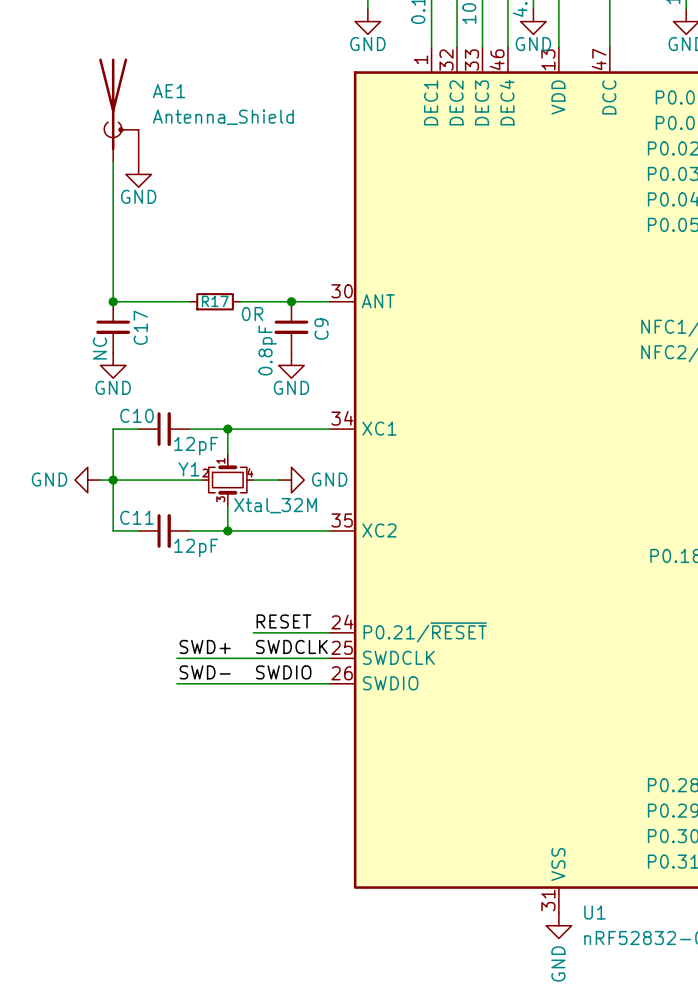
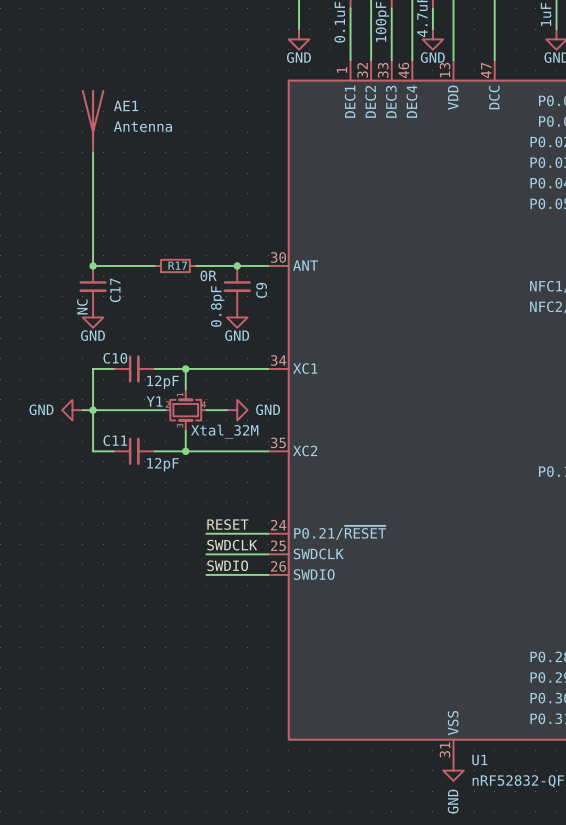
AE1 symbol: [99, 58, 139, 162] -> [81, 89, 105, 153]
AE1 value: Antenna_Shield (223, 117) -> Antenna (142, 126)
power symbol: GND (138, 174) -> none
label: SWD+ (205, 646) -> none
wire: (176, 658) (253, 658) -> none
label: SWD- (205, 672) -> none
wire: (176, 683) (253, 683) -> none

